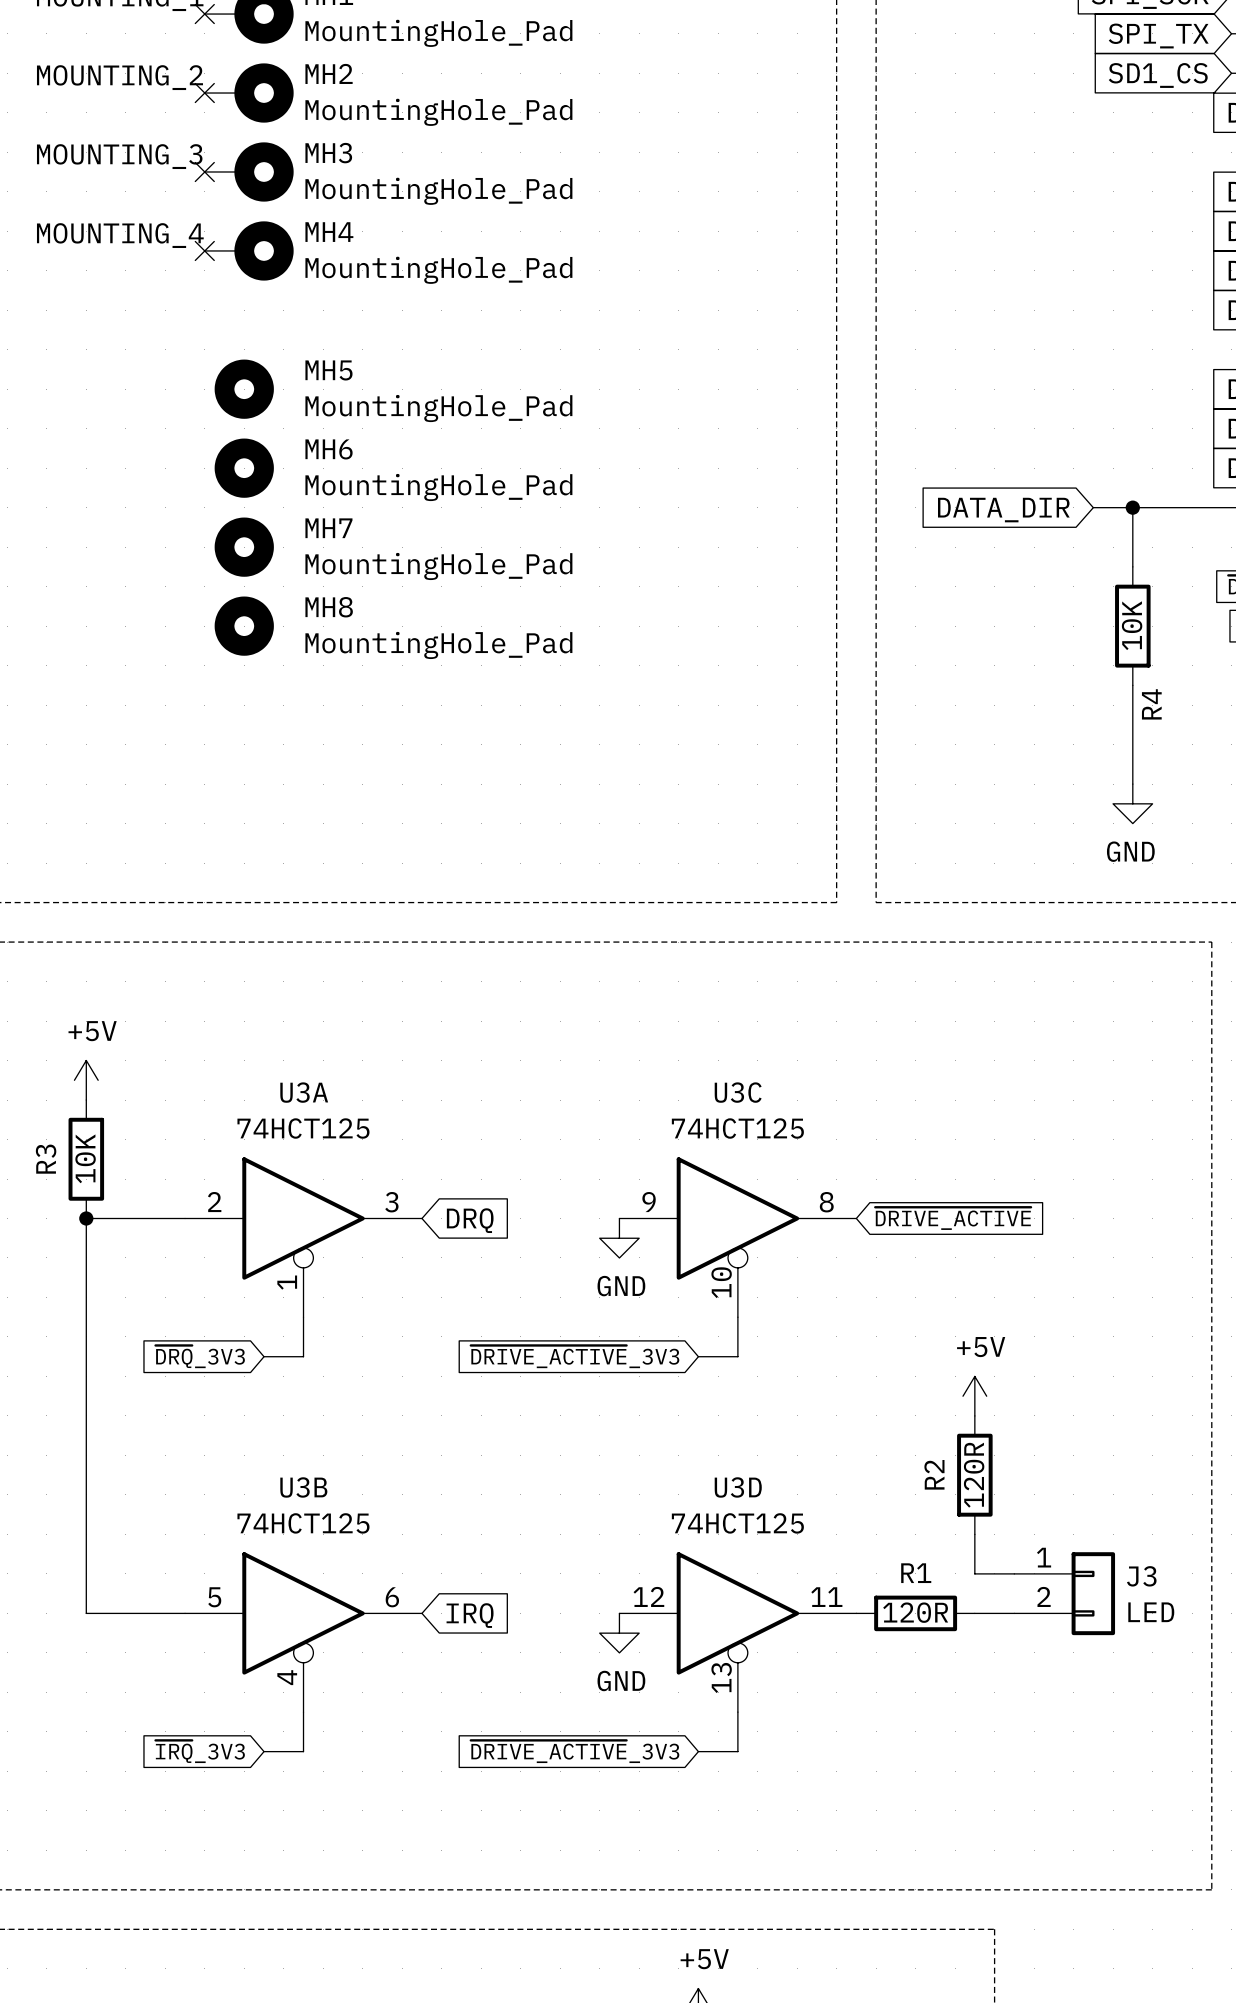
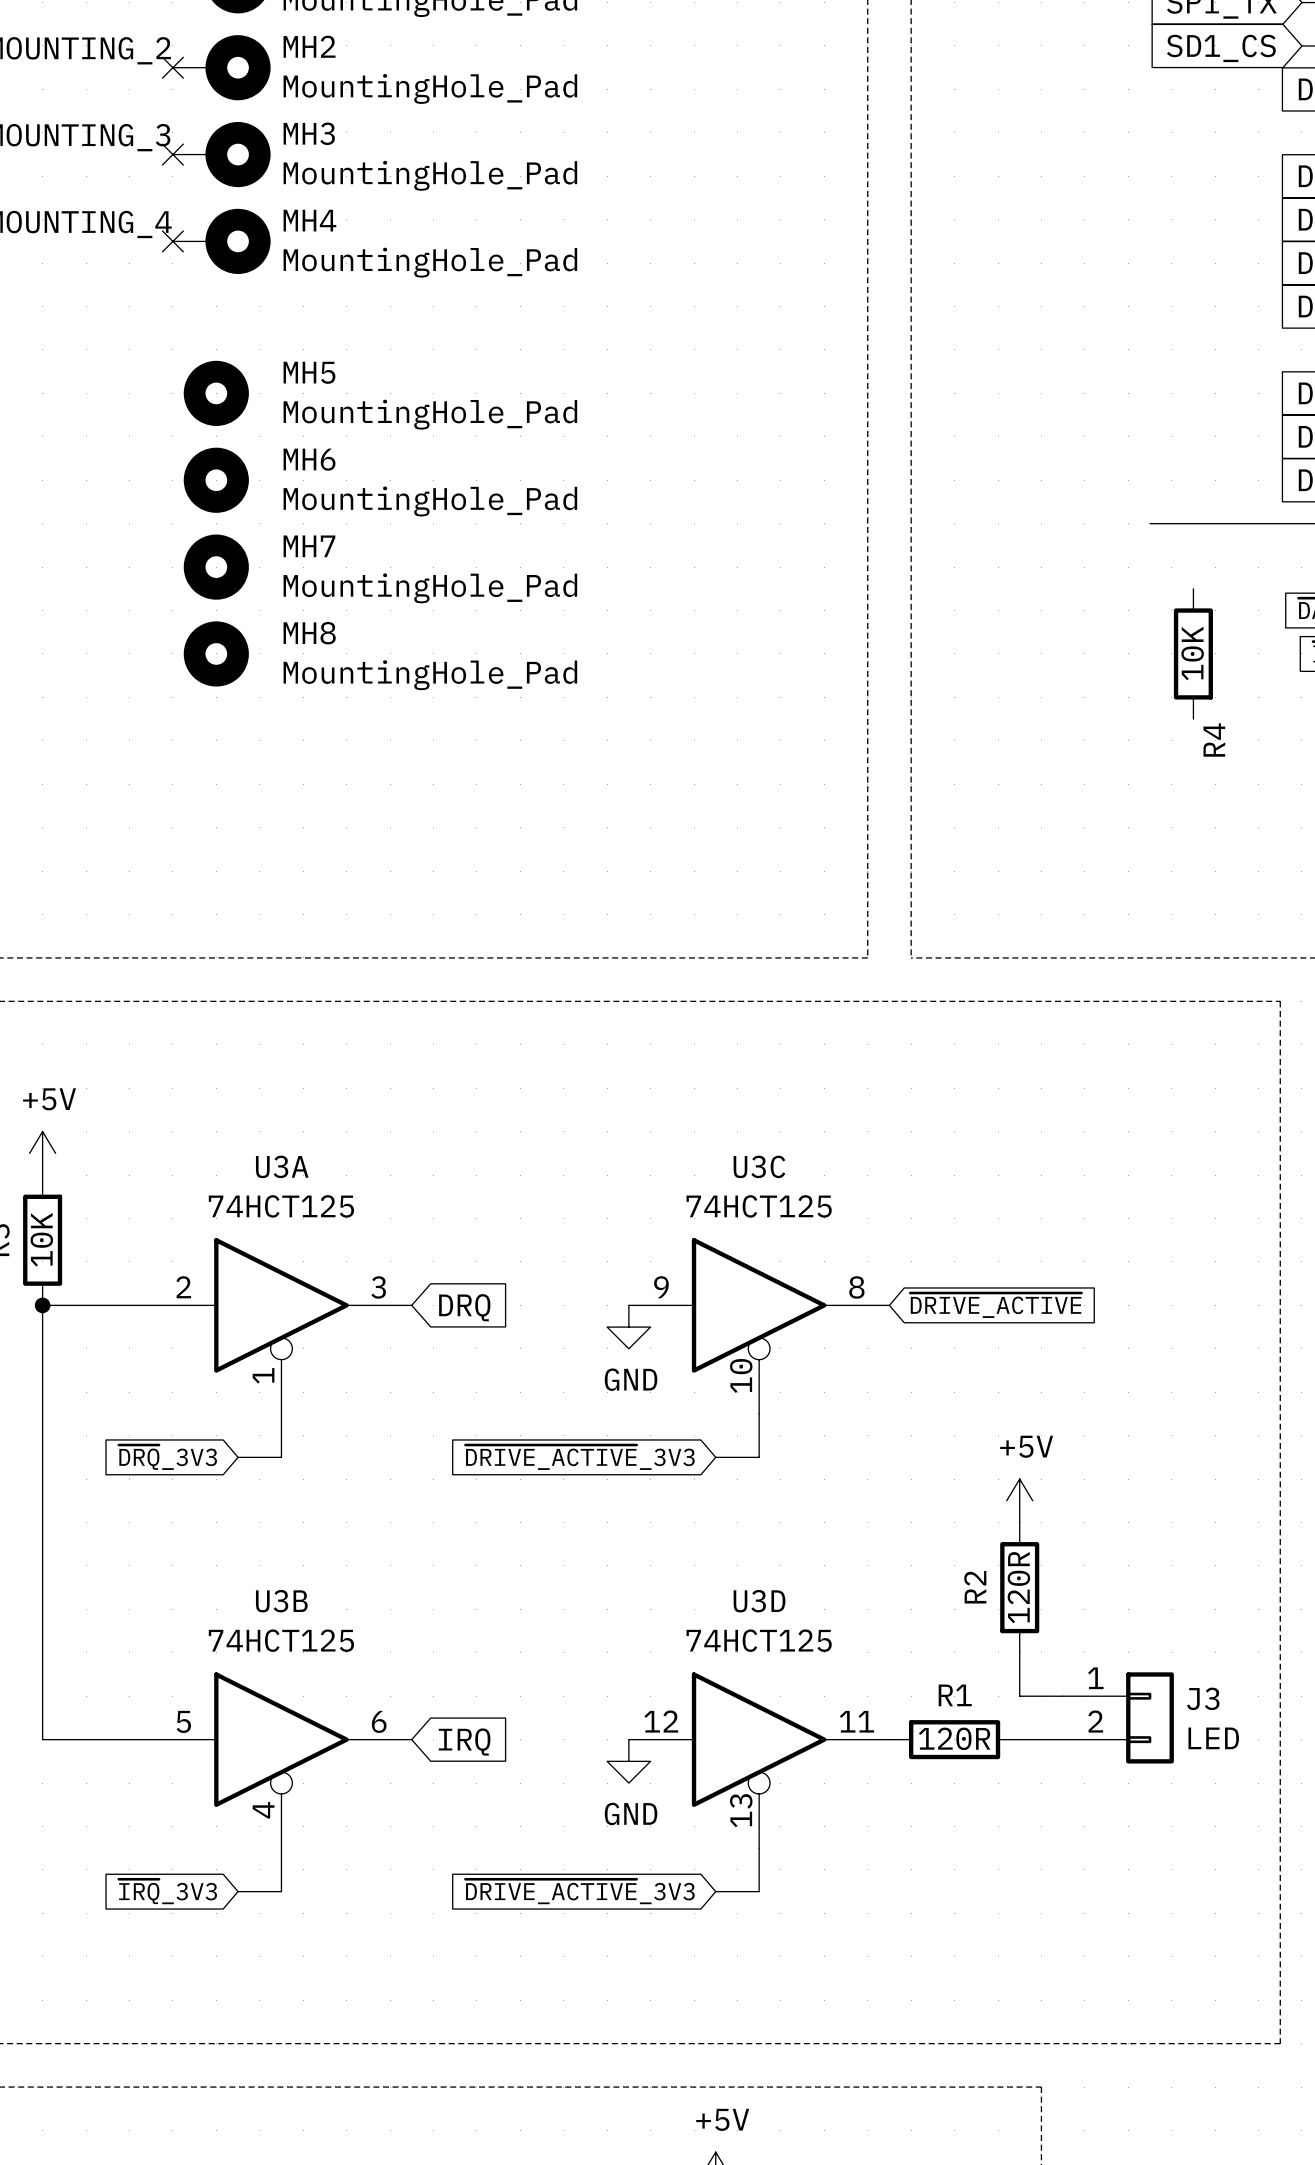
wire: (1132, 507) (1132, 566) -> none
junction: (1132, 507) -> none
global label: DATA_DIR (1003, 510) -> none
wire: (1132, 685) (1132, 784) -> none
power symbol: GND (1132, 803) -> none

